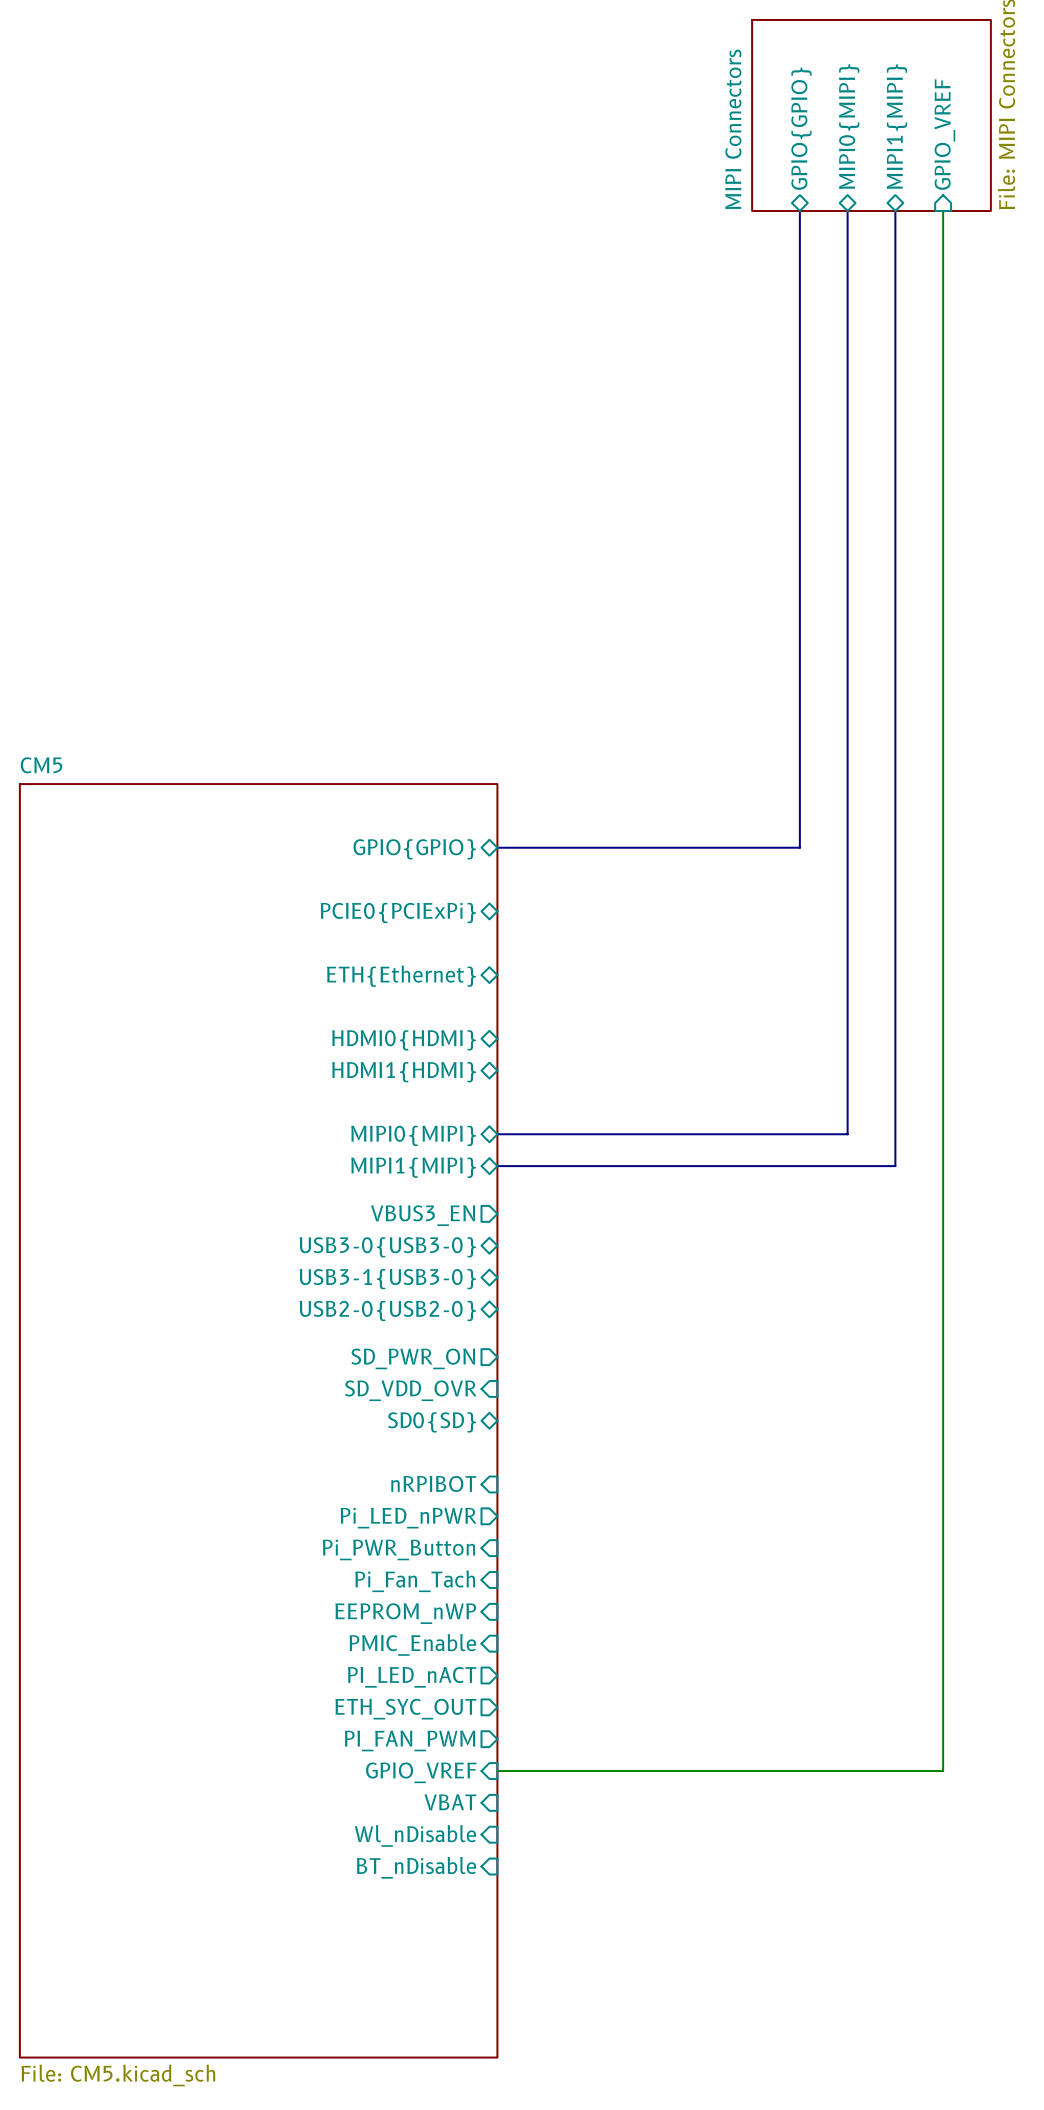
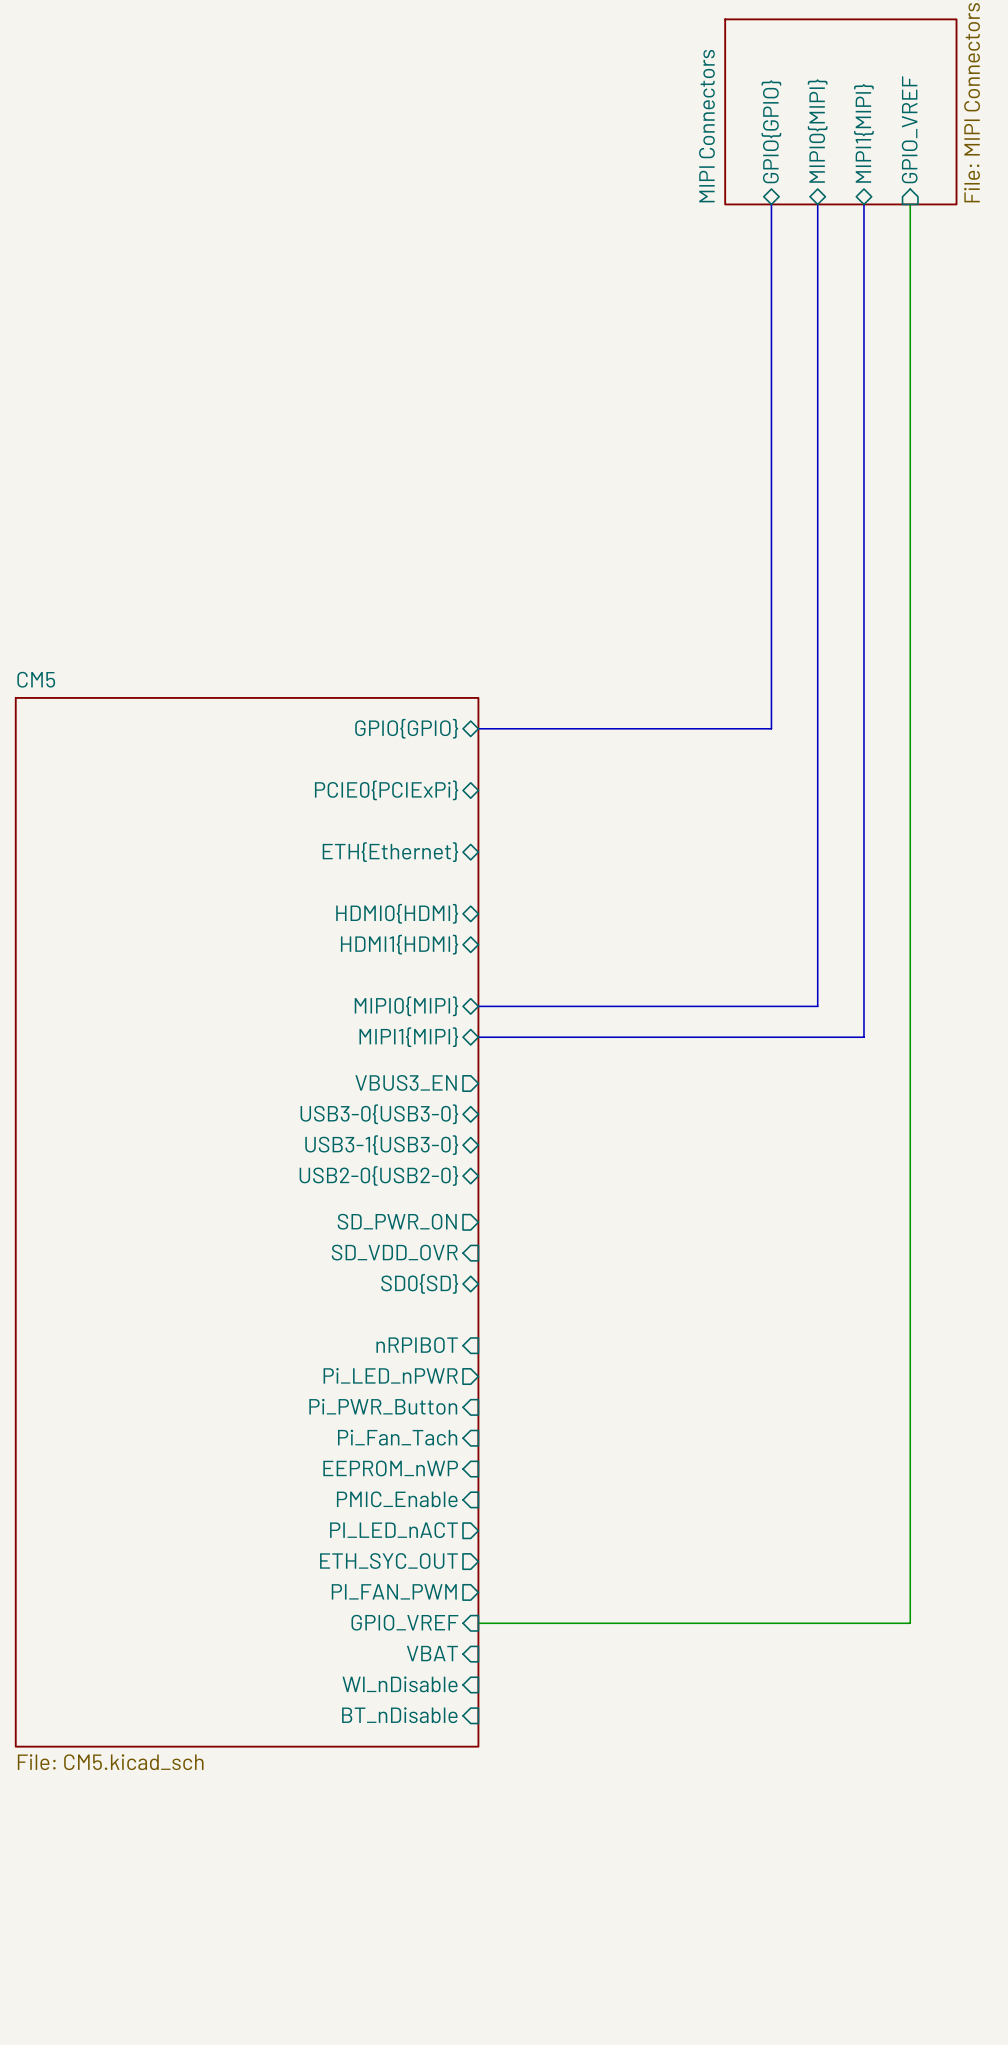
bus: (799, 752) (799, 847) (497, 847) -> (771, 728) (478, 728)
sheet CM5 name position: CM5 (41, 765) -> CM5 (36, 679)
sheet CM5 shape: [18, 783, 499, 2059] -> [14, 697, 480, 1748]
sheet pin position: GPIO{GPIO} (414, 849) -> GPIO{GPIO} (406, 728)
sheet pin: none -> ETH{Ethernet} (390, 852)
sheet pin position: PCIE0{PCIExPi} (398, 913) -> PCIE0{PCIExPi} (386, 790)
sheet pin: none -> HDMI0{HDMI} (397, 913)
sheet pin: ETH{Ethernet} (401, 976) -> HDMI1{HDMI} (399, 944)
bus: (847, 1038) (847, 1134) (497, 1134) -> (817, 1006) (478, 1006)
sheet pin: HDMI0{HDMI} (404, 1040) -> MIPI0{MIPI} (406, 1006)
bus: (895, 1070) (895, 1166) (497, 1166) -> (863, 1037) (478, 1037)
sheet pin: HDMI1{HDMI} (404, 1072) -> MIPI1{MIPI} (408, 1037)
sheet pin: none -> VBUS3_EN (406, 1082)
sheet pin: MIPI0{MIPI} (413, 1135) -> none
sheet pin: MIPI1{MIPI} (413, 1167) -> none
sheet pin shape: output (423, 1215) -> bidirectional (378, 1175)
sheet pin: VBUS3_EN (423, 1215) -> USB2-0{USB2-0} (378, 1175)
sheet pin position: USB3-0{USB3-0} (387, 1247) -> USB3-0{USB3-0} (379, 1114)
sheet pin position: USB3-1{USB3-0} (387, 1279) -> USB3-1{USB3-0} (381, 1145)
sheet pin: none -> SD_VDD_OVR (394, 1252)
sheet pin: USB2-0{USB2-0} (387, 1310) -> none
sheet pin: none -> SD0{SD} (419, 1283)
sheet pin position: SD_PWR_ON (413, 1358) -> SD_PWR_ON (397, 1221)
sheet pin: SD_VDD_OVR (410, 1390) -> nRPIBOT (417, 1345)
sheet pin shape: bidirectional (431, 1422) -> output (390, 1375)
sheet pin: SD0{SD} (431, 1422) -> Pi_LED_nPWR (390, 1375)
sheet pin: none -> Pi_PWR_Button (383, 1406)
sheet pin: nRPIBOT (433, 1483) -> Pi_Fan_Tach (397, 1437)
sheet pin shape: output (408, 1518) -> input (390, 1468)
sheet pin: Pi_LED_nPWR (408, 1518) -> EEPROM_nWP (390, 1468)
sheet pin: Pi_PWR_Button (398, 1549) -> PMIC_Enable (397, 1499)
sheet pin shape: input (415, 1581) -> output (393, 1530)
sheet pin: Pi_Fan_Tach (415, 1581) -> PI_LED_nACT (393, 1530)
sheet pin shape: input (405, 1613) -> output (388, 1561)
sheet pin: EEPROM_nWP (405, 1613) -> ETH_SYC_OUT (388, 1561)
sheet pin shape: input (412, 1644) -> output (394, 1591)
sheet pin: PMIC_Enable (412, 1644) -> PI_FAN_PWM (394, 1591)
wire: (943, 1675) (943, 1771) (497, 1771) -> (910, 1623) (478, 1623)
sheet pin shape: output (412, 1677) -> input (404, 1622)
sheet pin: PI_LED_nACT (412, 1677) -> GPIO_VREF (404, 1622)
sheet pin shape: output (405, 1709) -> input (432, 1653)
sheet pin: ETH_SYC_OUT (405, 1709) -> VBAT (432, 1653)
sheet pin shape: output (409, 1740) -> input (400, 1684)
sheet pin: PI_FAN_PWM (409, 1740) -> Wl_nDisable (400, 1684)
sheet pin: GPIO_VREF (421, 1772) -> BT_nDisable (399, 1715)
sheet pin: VBAT (450, 1802) -> none
sheet pin: Wl_nDisable (415, 1835) -> none
sheet pin: BT_nDisable (416, 1867) -> none
sheet CM5 value position: File: CM5.kicad_sch (118, 2075) -> File: CM5.kicad_sch (110, 1762)

